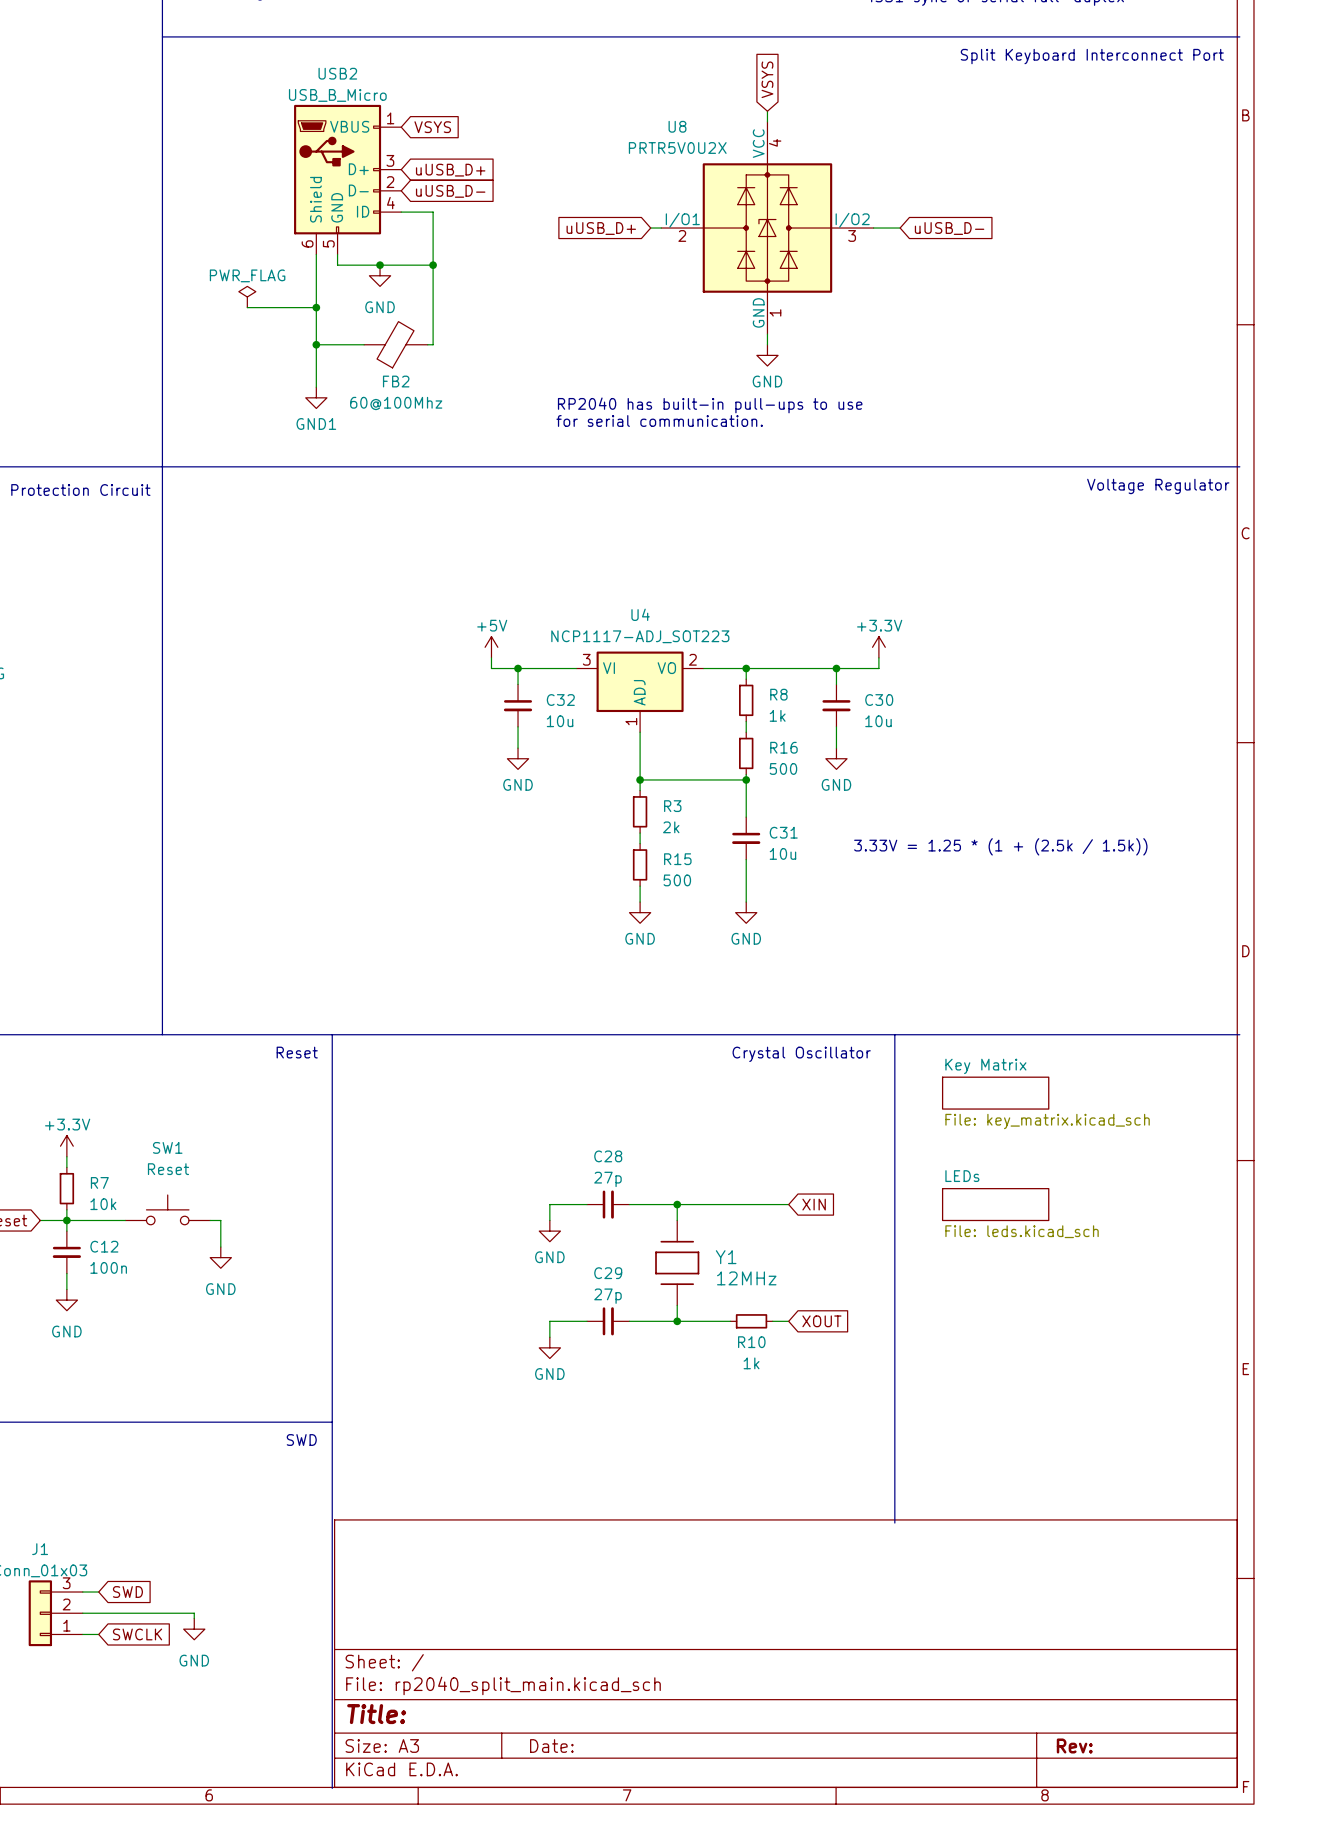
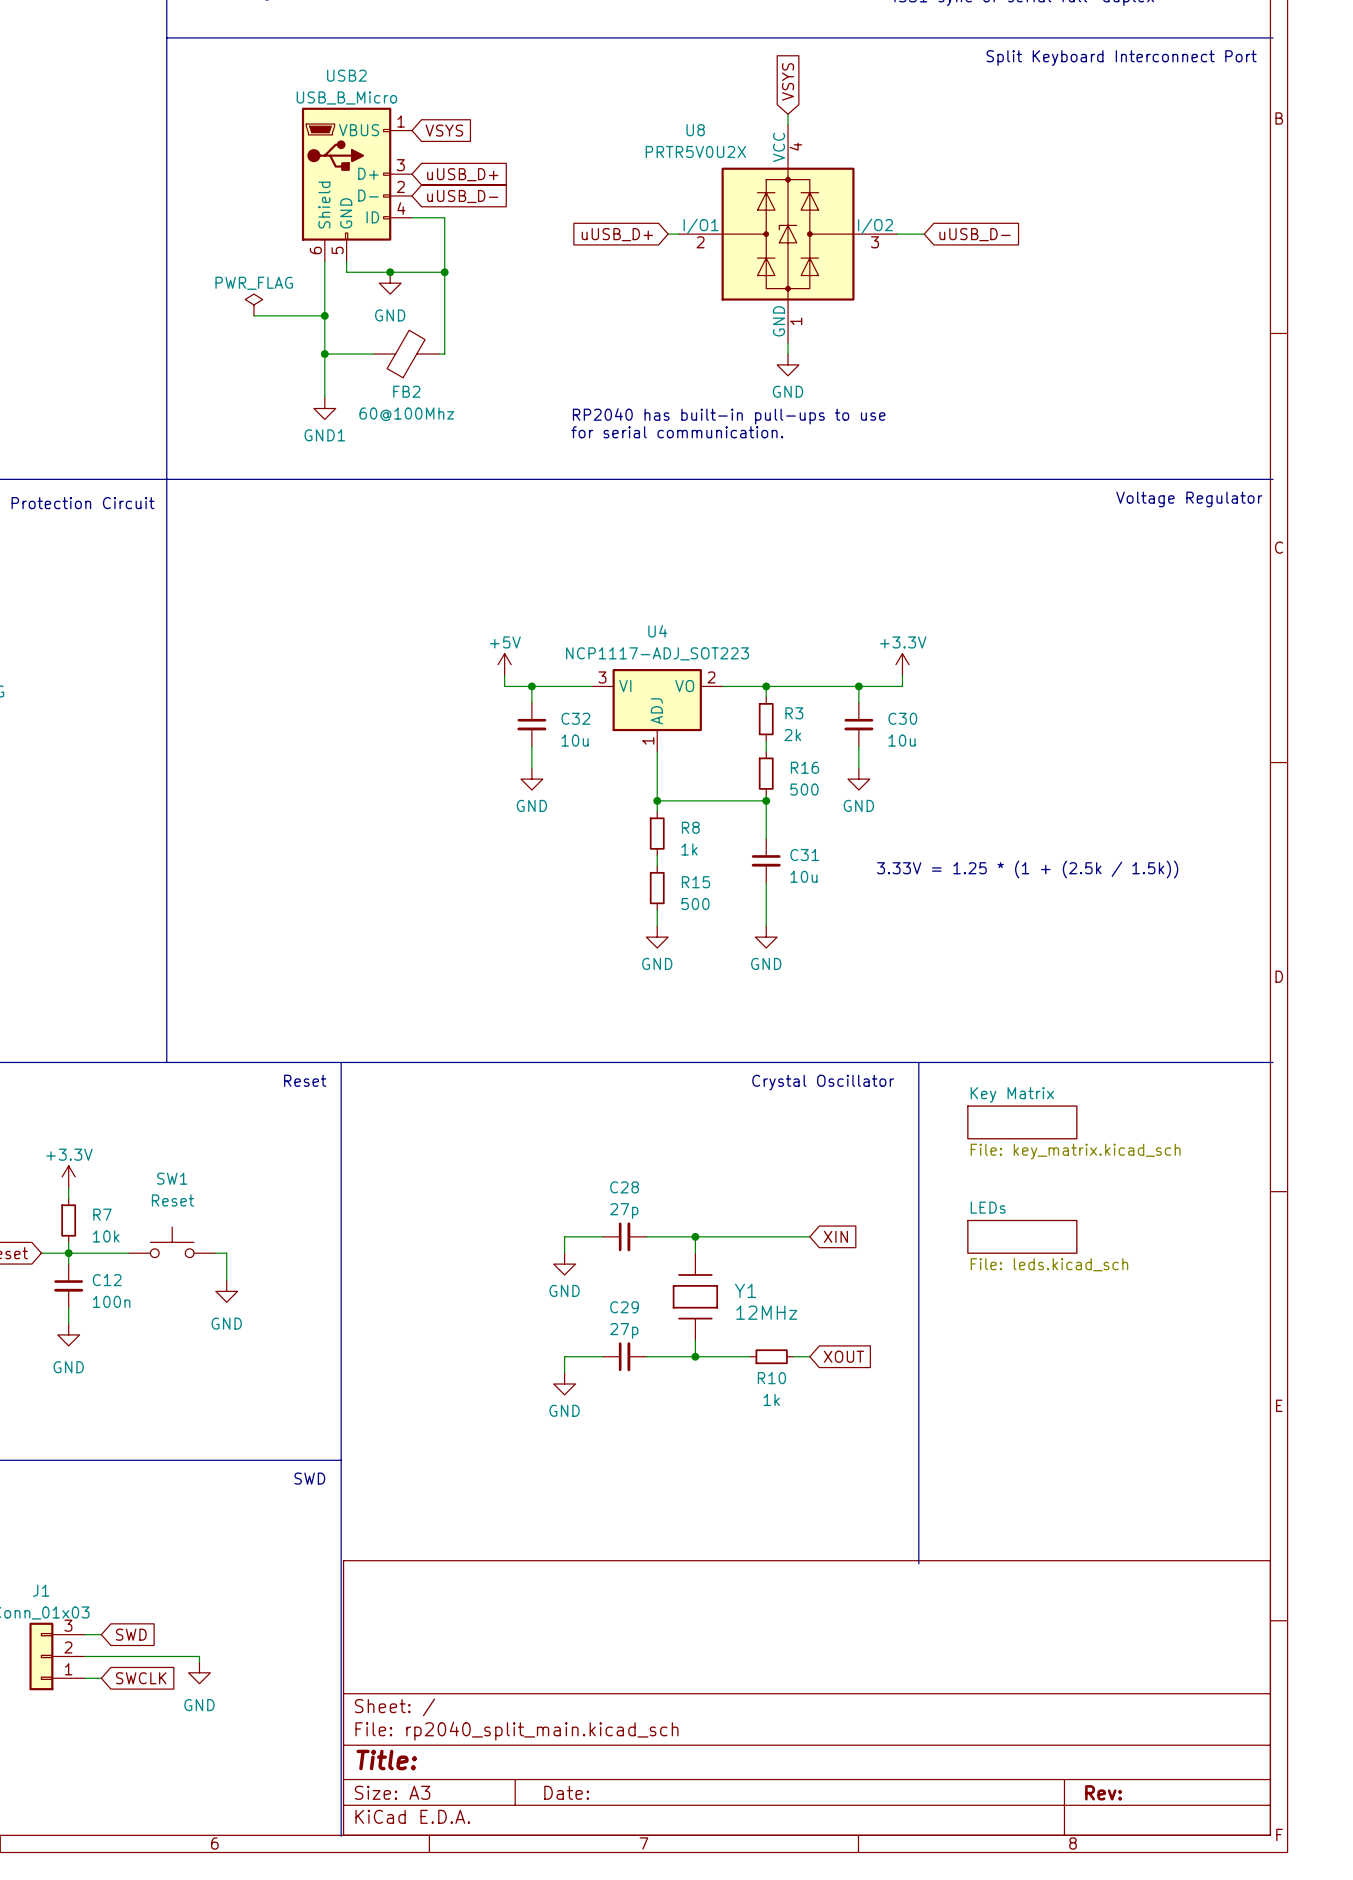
R8 name: R8 (778, 694) -> R3 (794, 713)
R8 value: 1k (777, 715) -> 2k (792, 735)
R3 name: R3 (672, 806) -> R8 (690, 827)
R3 value: 2k (671, 827) -> 1k (689, 849)

